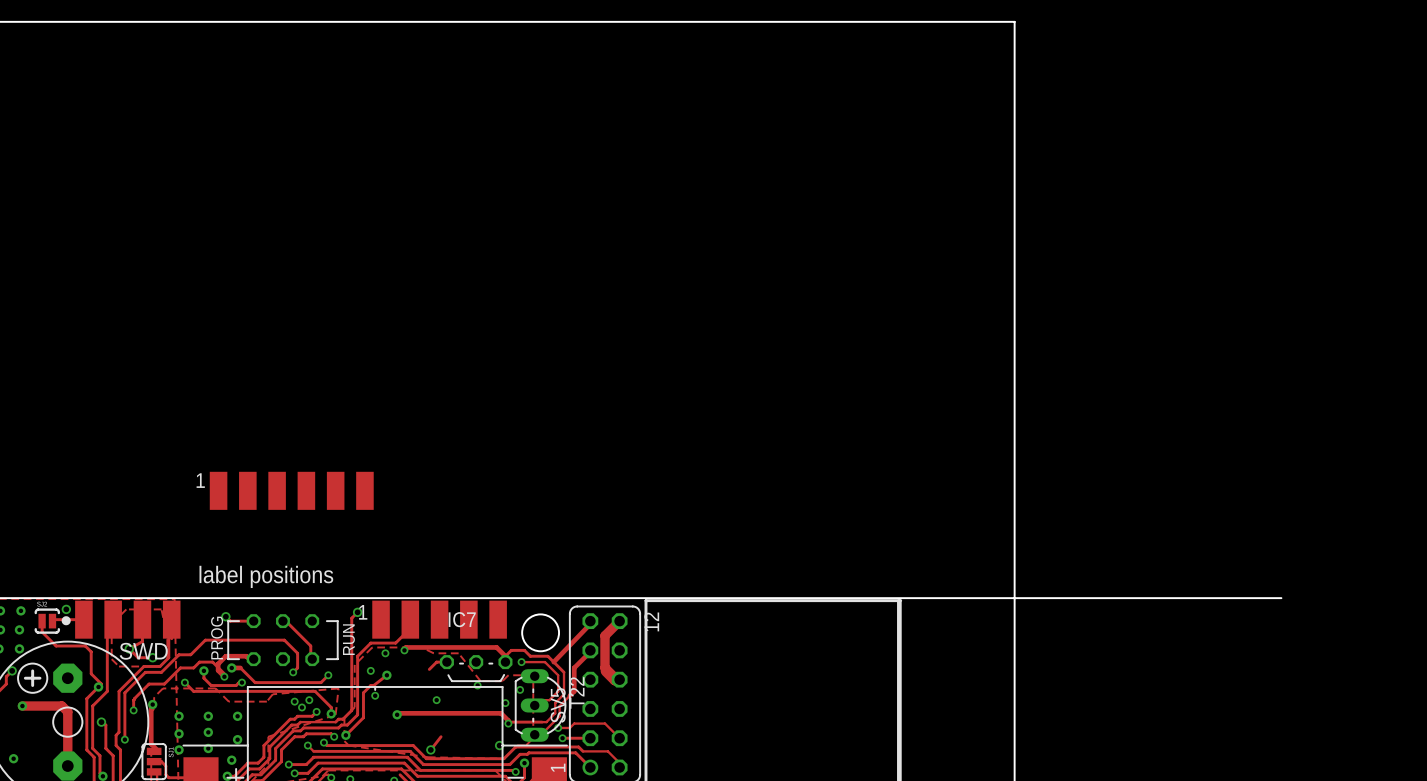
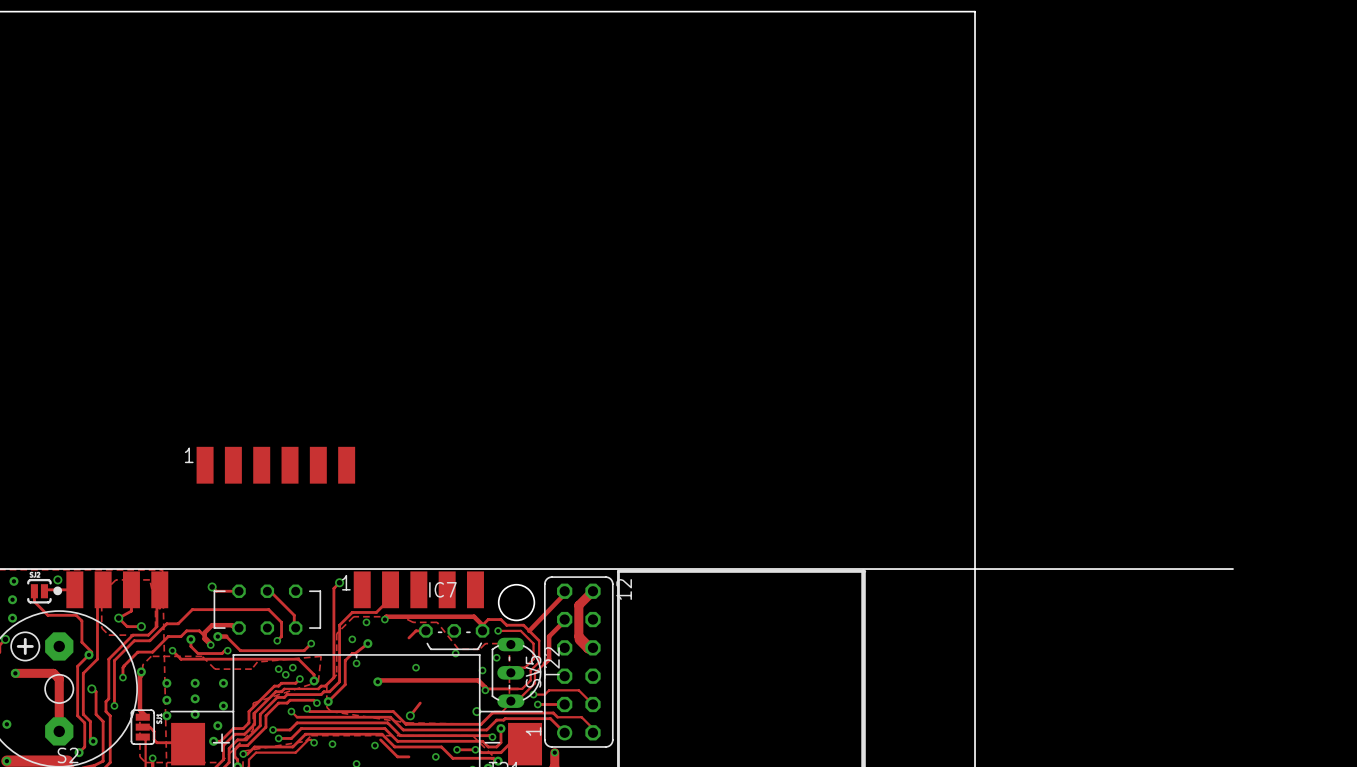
text: label positions (266, 576) -> none
text: PROG (217, 638) -> none
text: RUN (348, 639) -> none
text: SWD (143, 651) -> none

